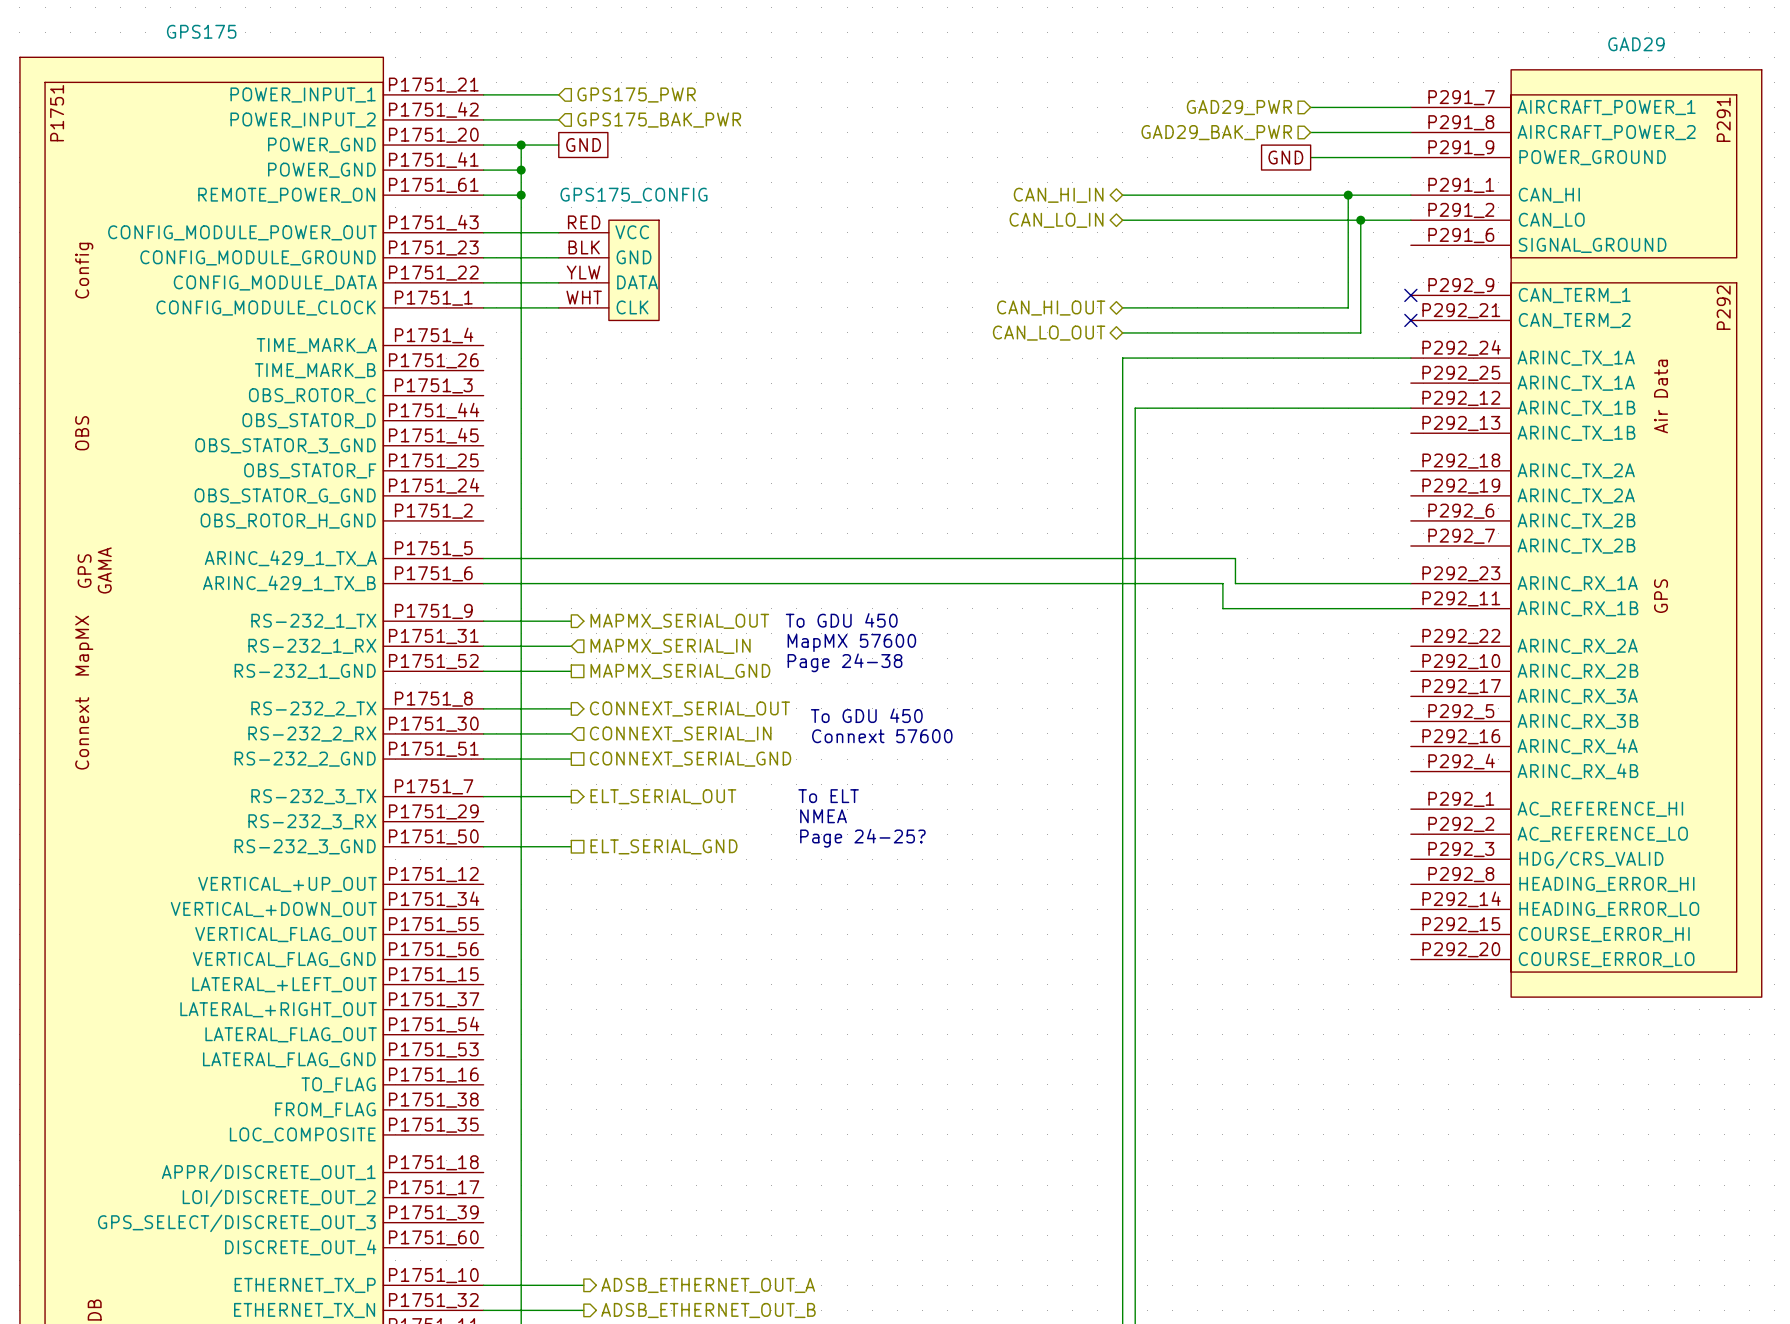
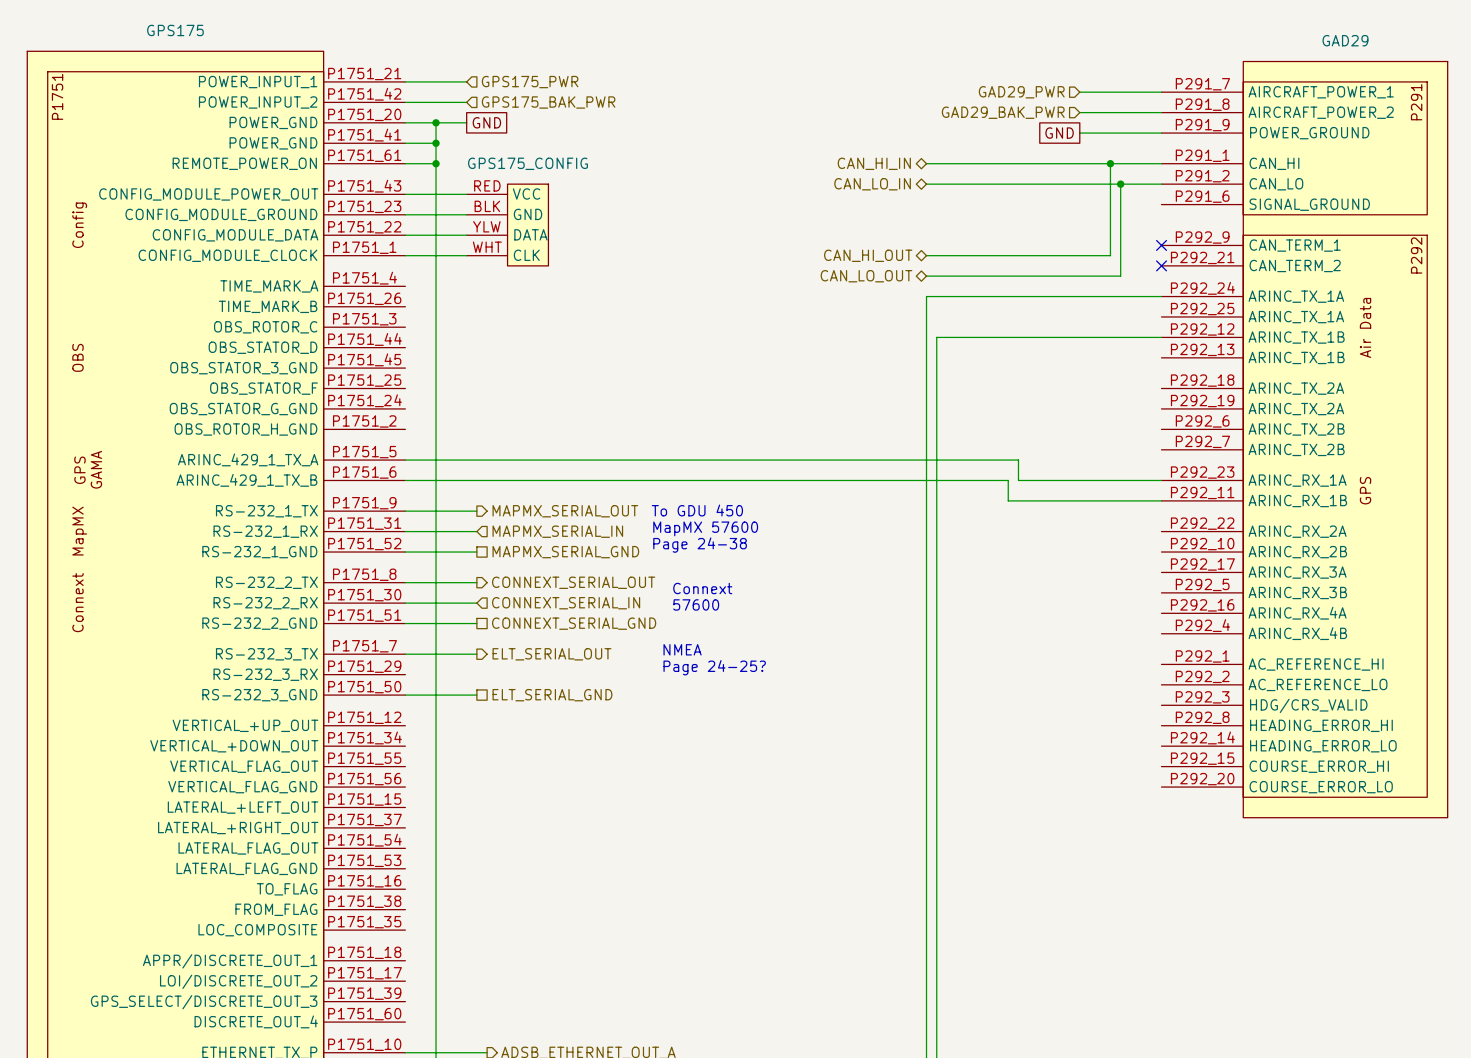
text: To GDU 450 (866, 715) -> Connext (702, 588)
text: Connext 57600 (882, 736) -> 57600 (696, 604)
text: To ELT (828, 796) -> NMEA (682, 649)
text: NMEA (823, 816) -> Page 24-25? (714, 667)
text: Page 24-25? (862, 838) -> none

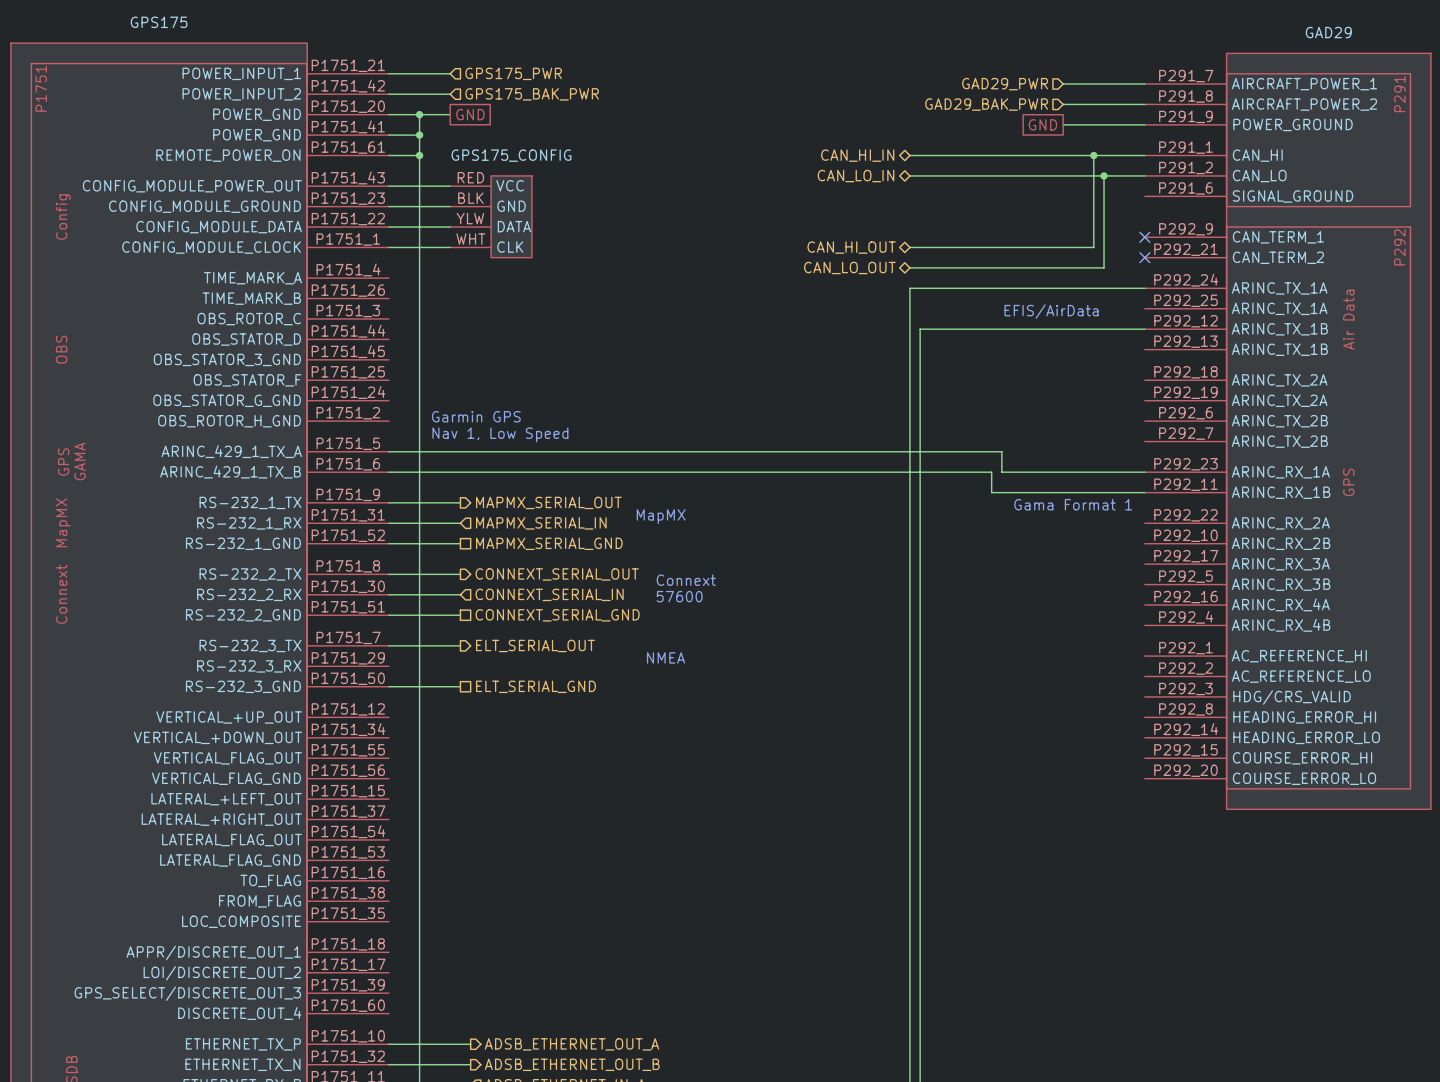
text: none -> EFIS/AirData (1051, 311)
text: none -> Garmin GPS (476, 416)
text: none -> Nav 1, Low Speed (500, 434)
text: To GDU 450 (697, 510) -> none
text: none -> Gama Format 1 (1073, 504)
text: MapMX 57600 (705, 528) -> MapMX (661, 516)
text: Page 24-38 (700, 545) -> none
text: NMEA (682, 649) -> none
text: Page 24-25? (714, 667) -> NMEA (666, 657)

